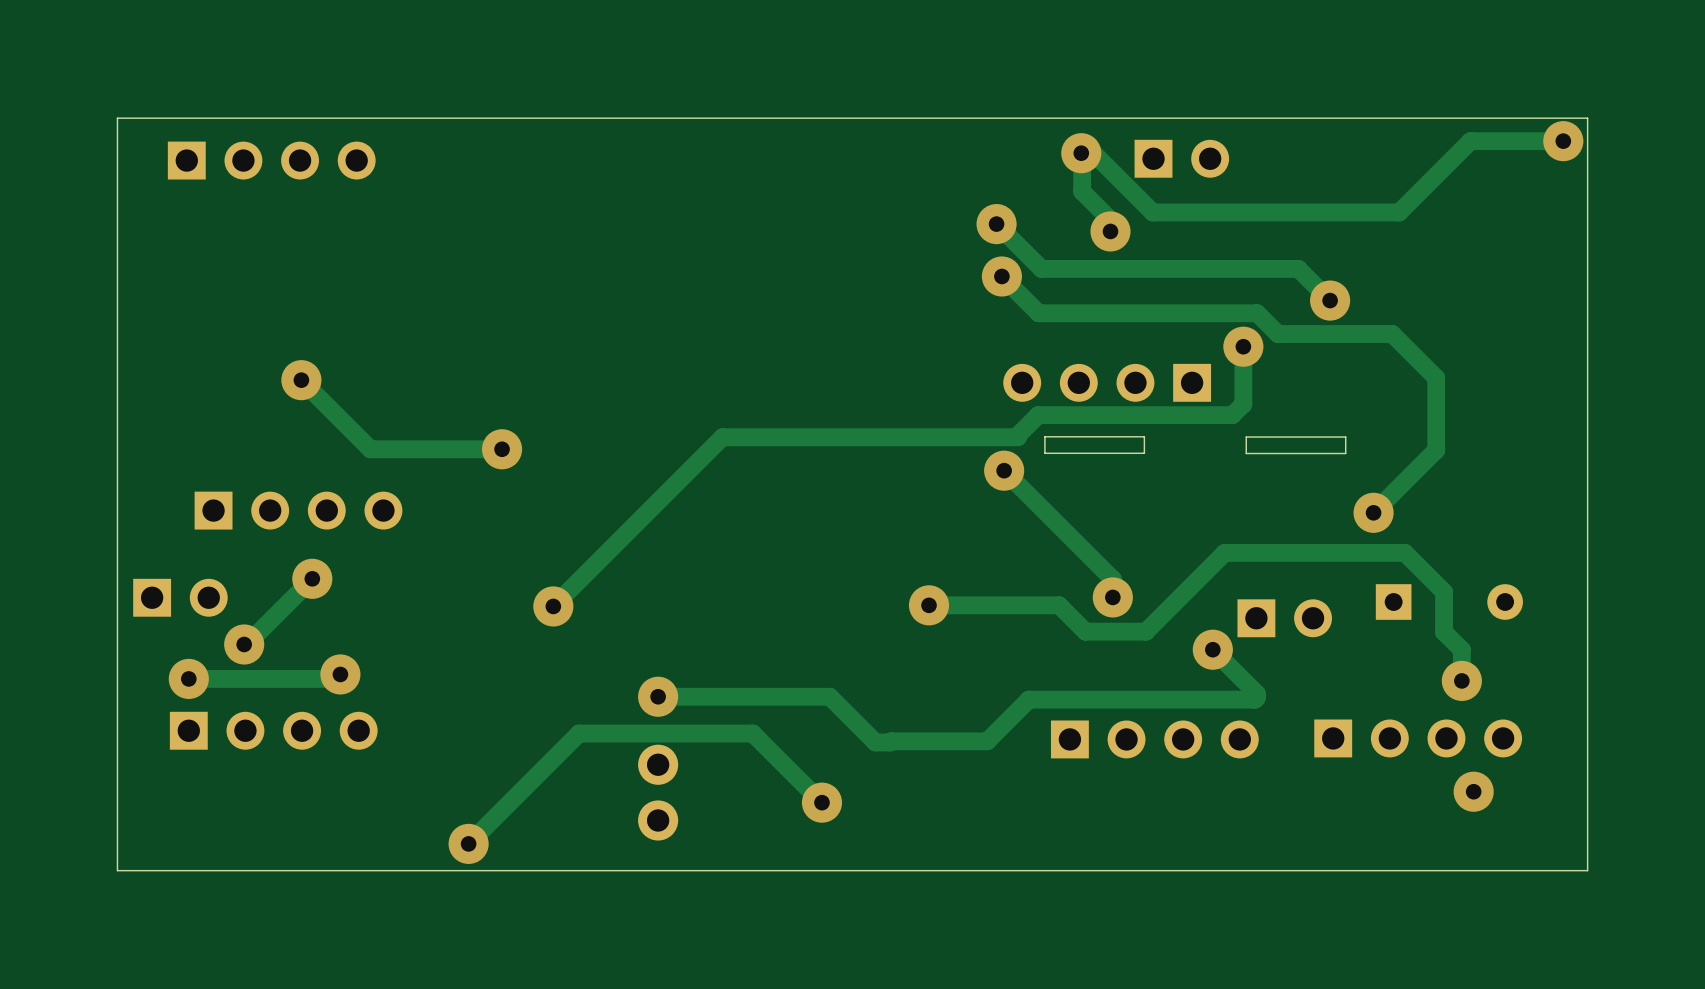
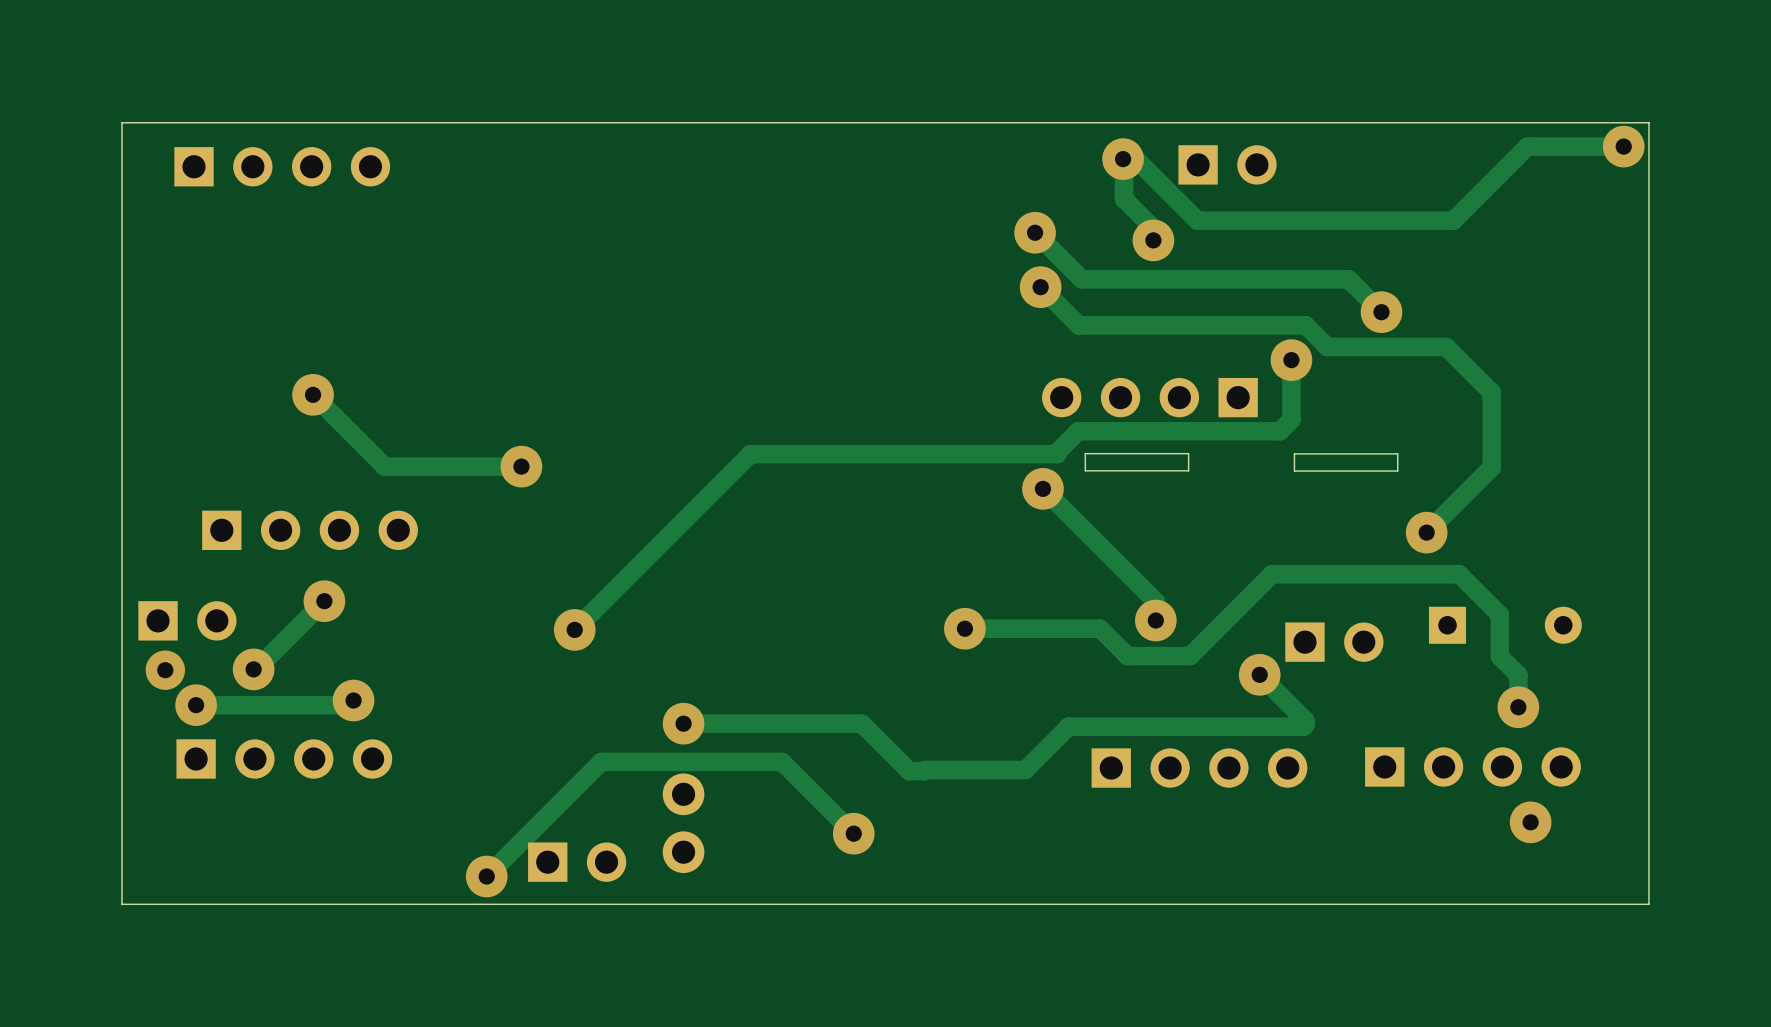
via: none -> (165, 670)
part: none -> (577, 862)

